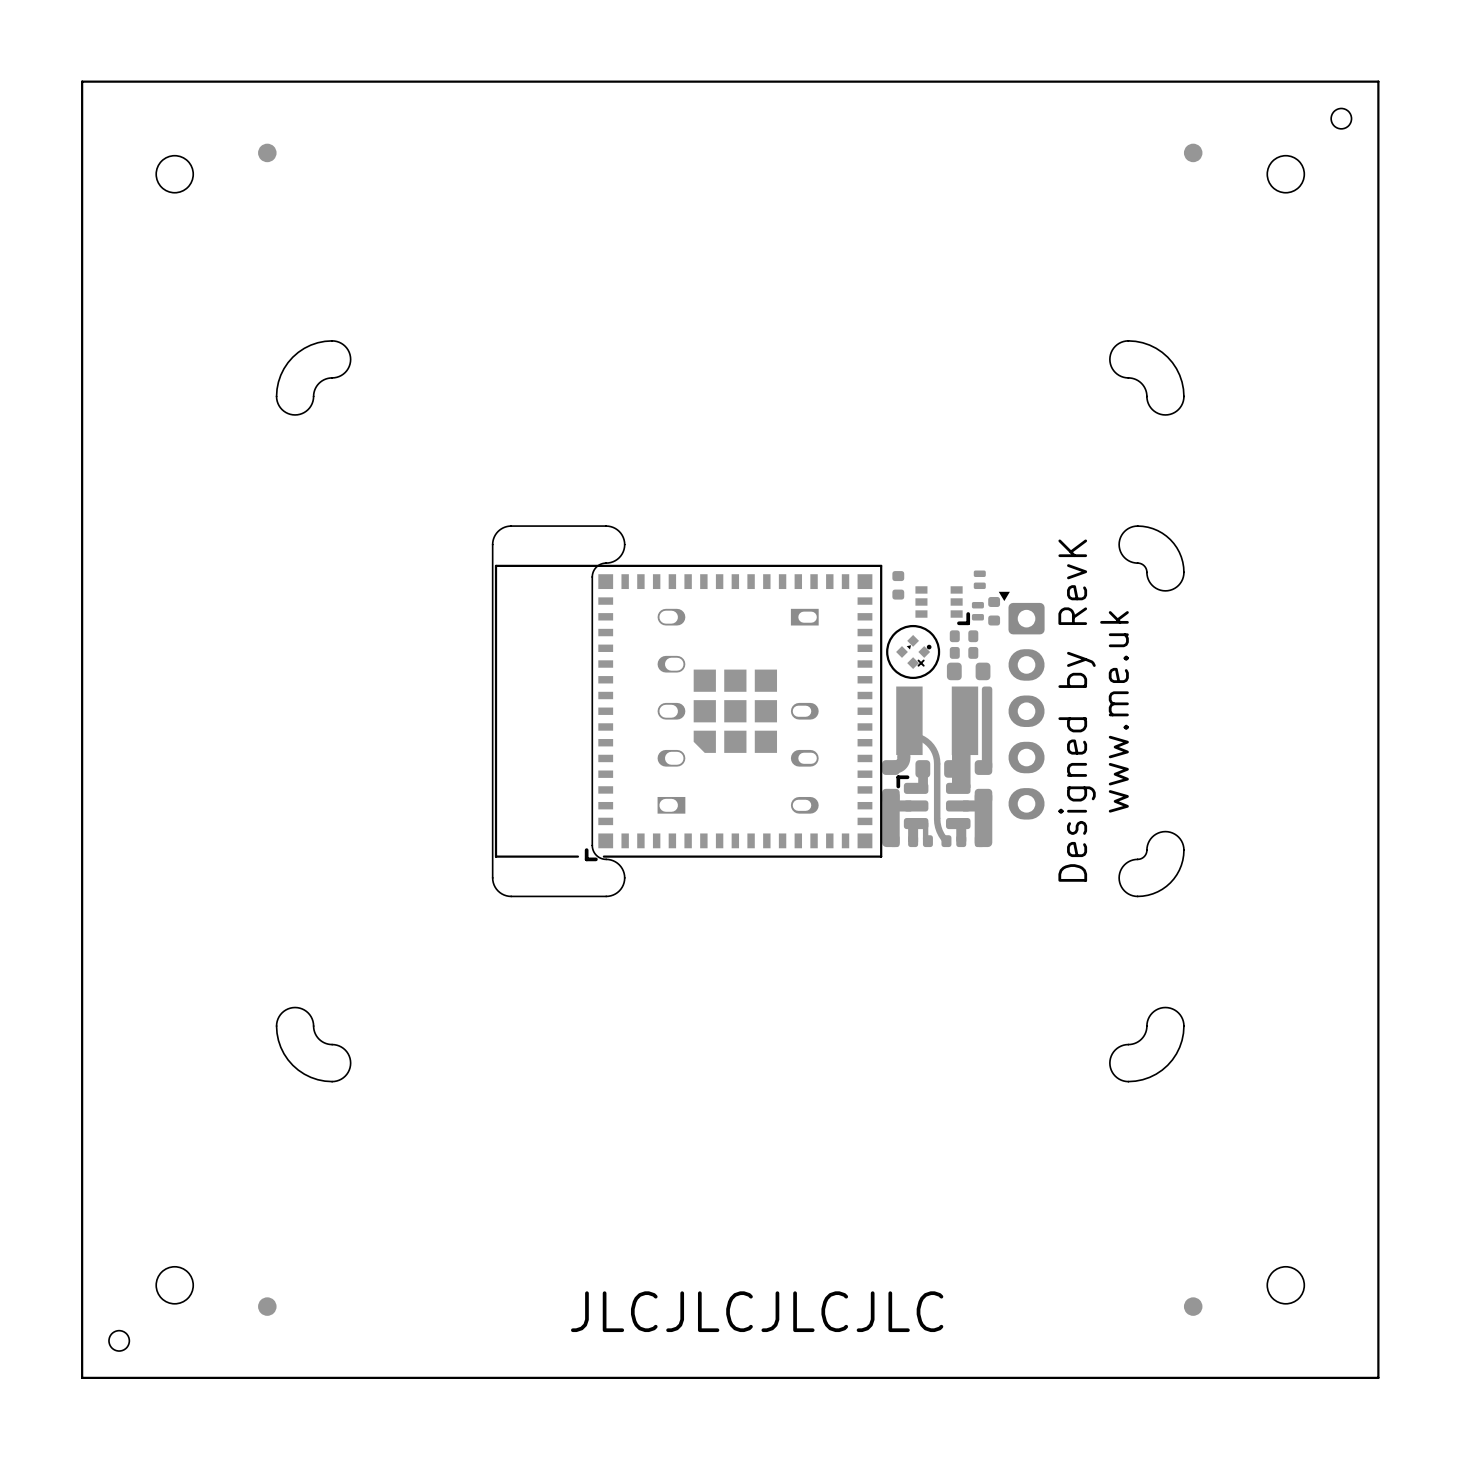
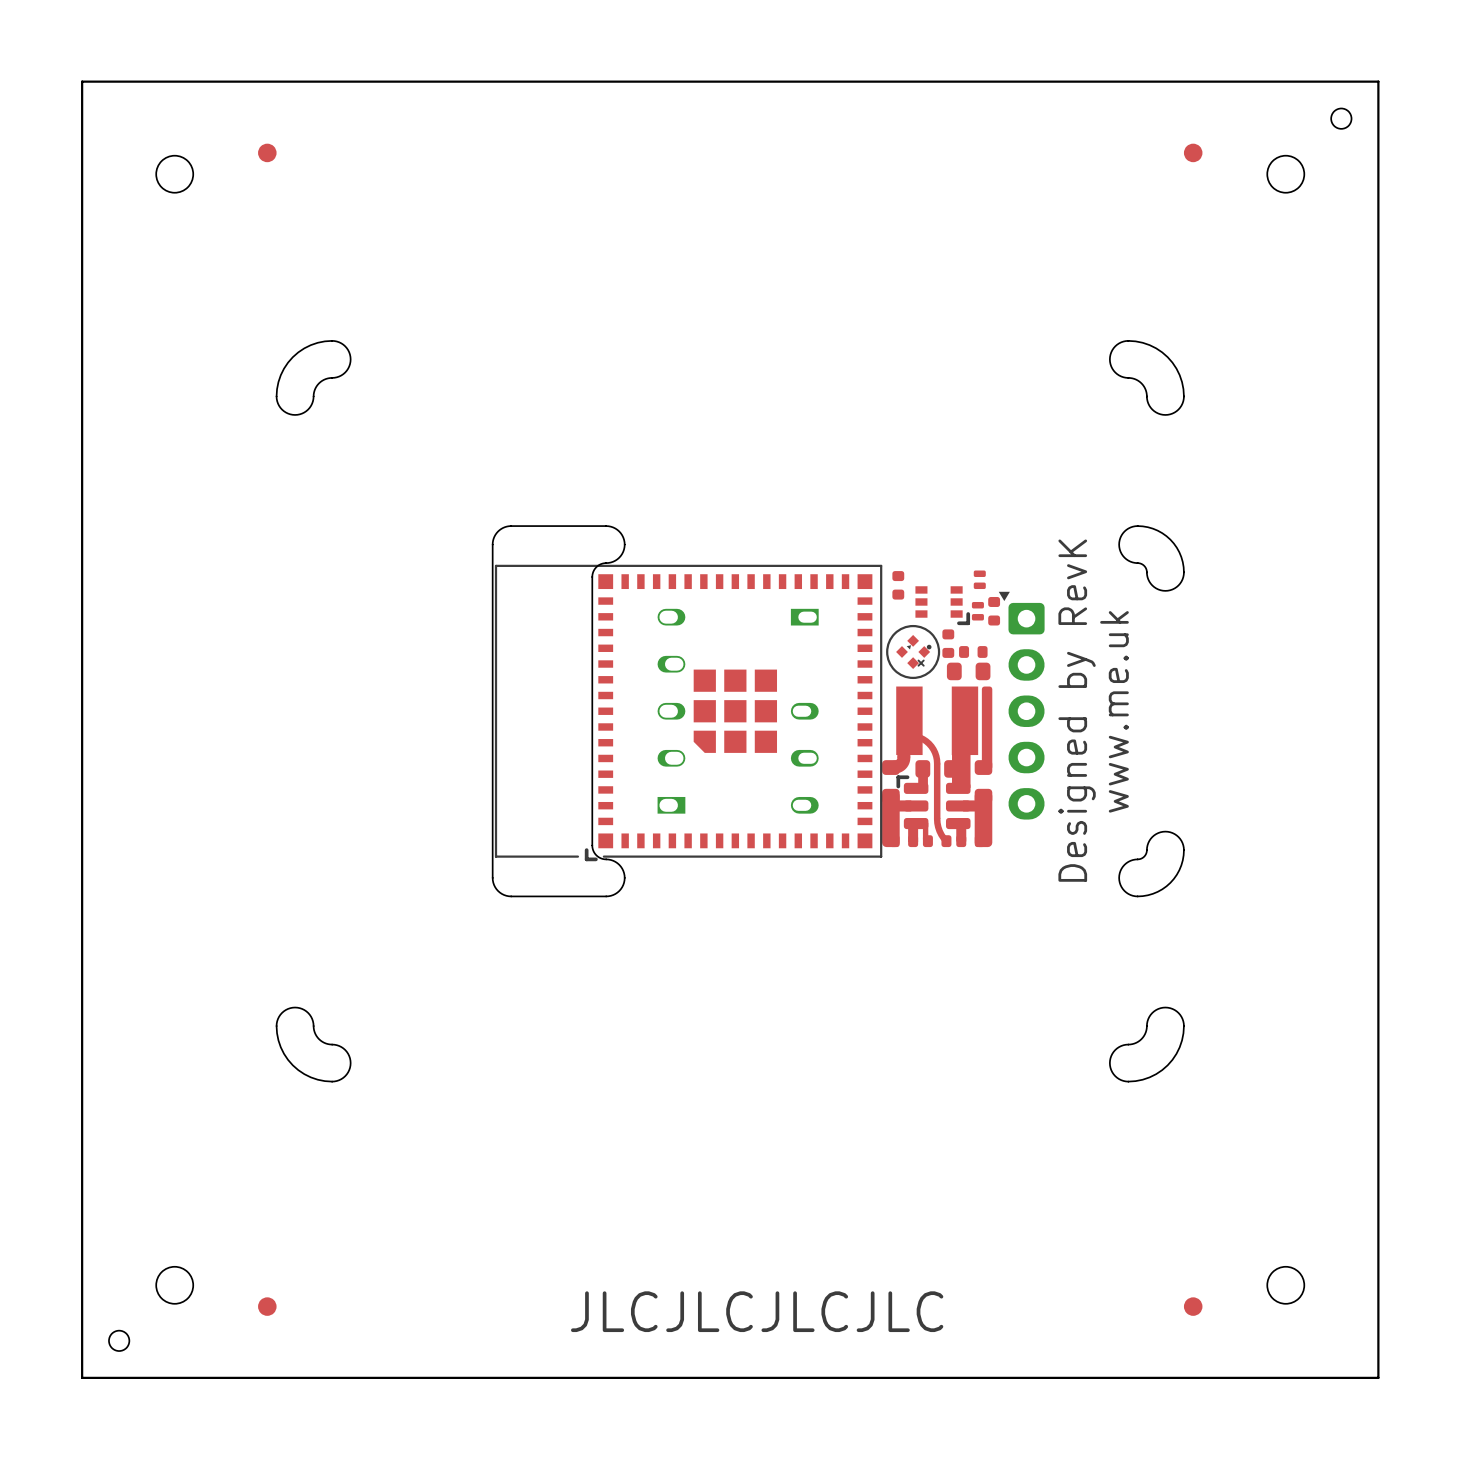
part: (964, 636) -> none
part: none -> (948, 643)
part: none -> (973, 651)
part: (964, 652) -> none

